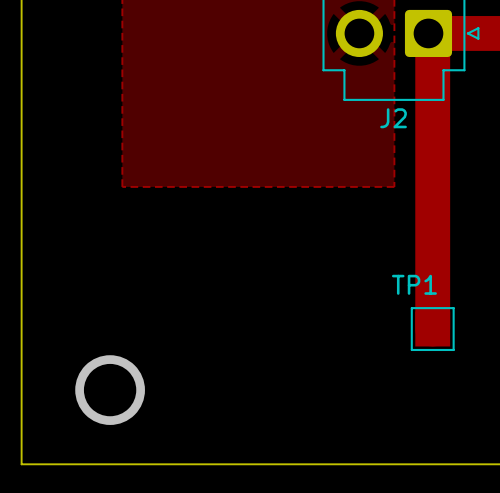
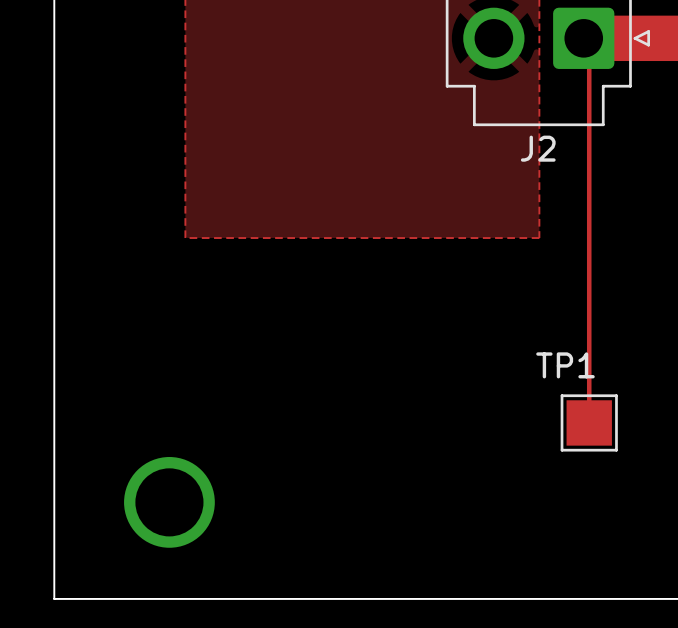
track width: thick (432, 37) (432, 329) -> thin (589, 43) (589, 422)

